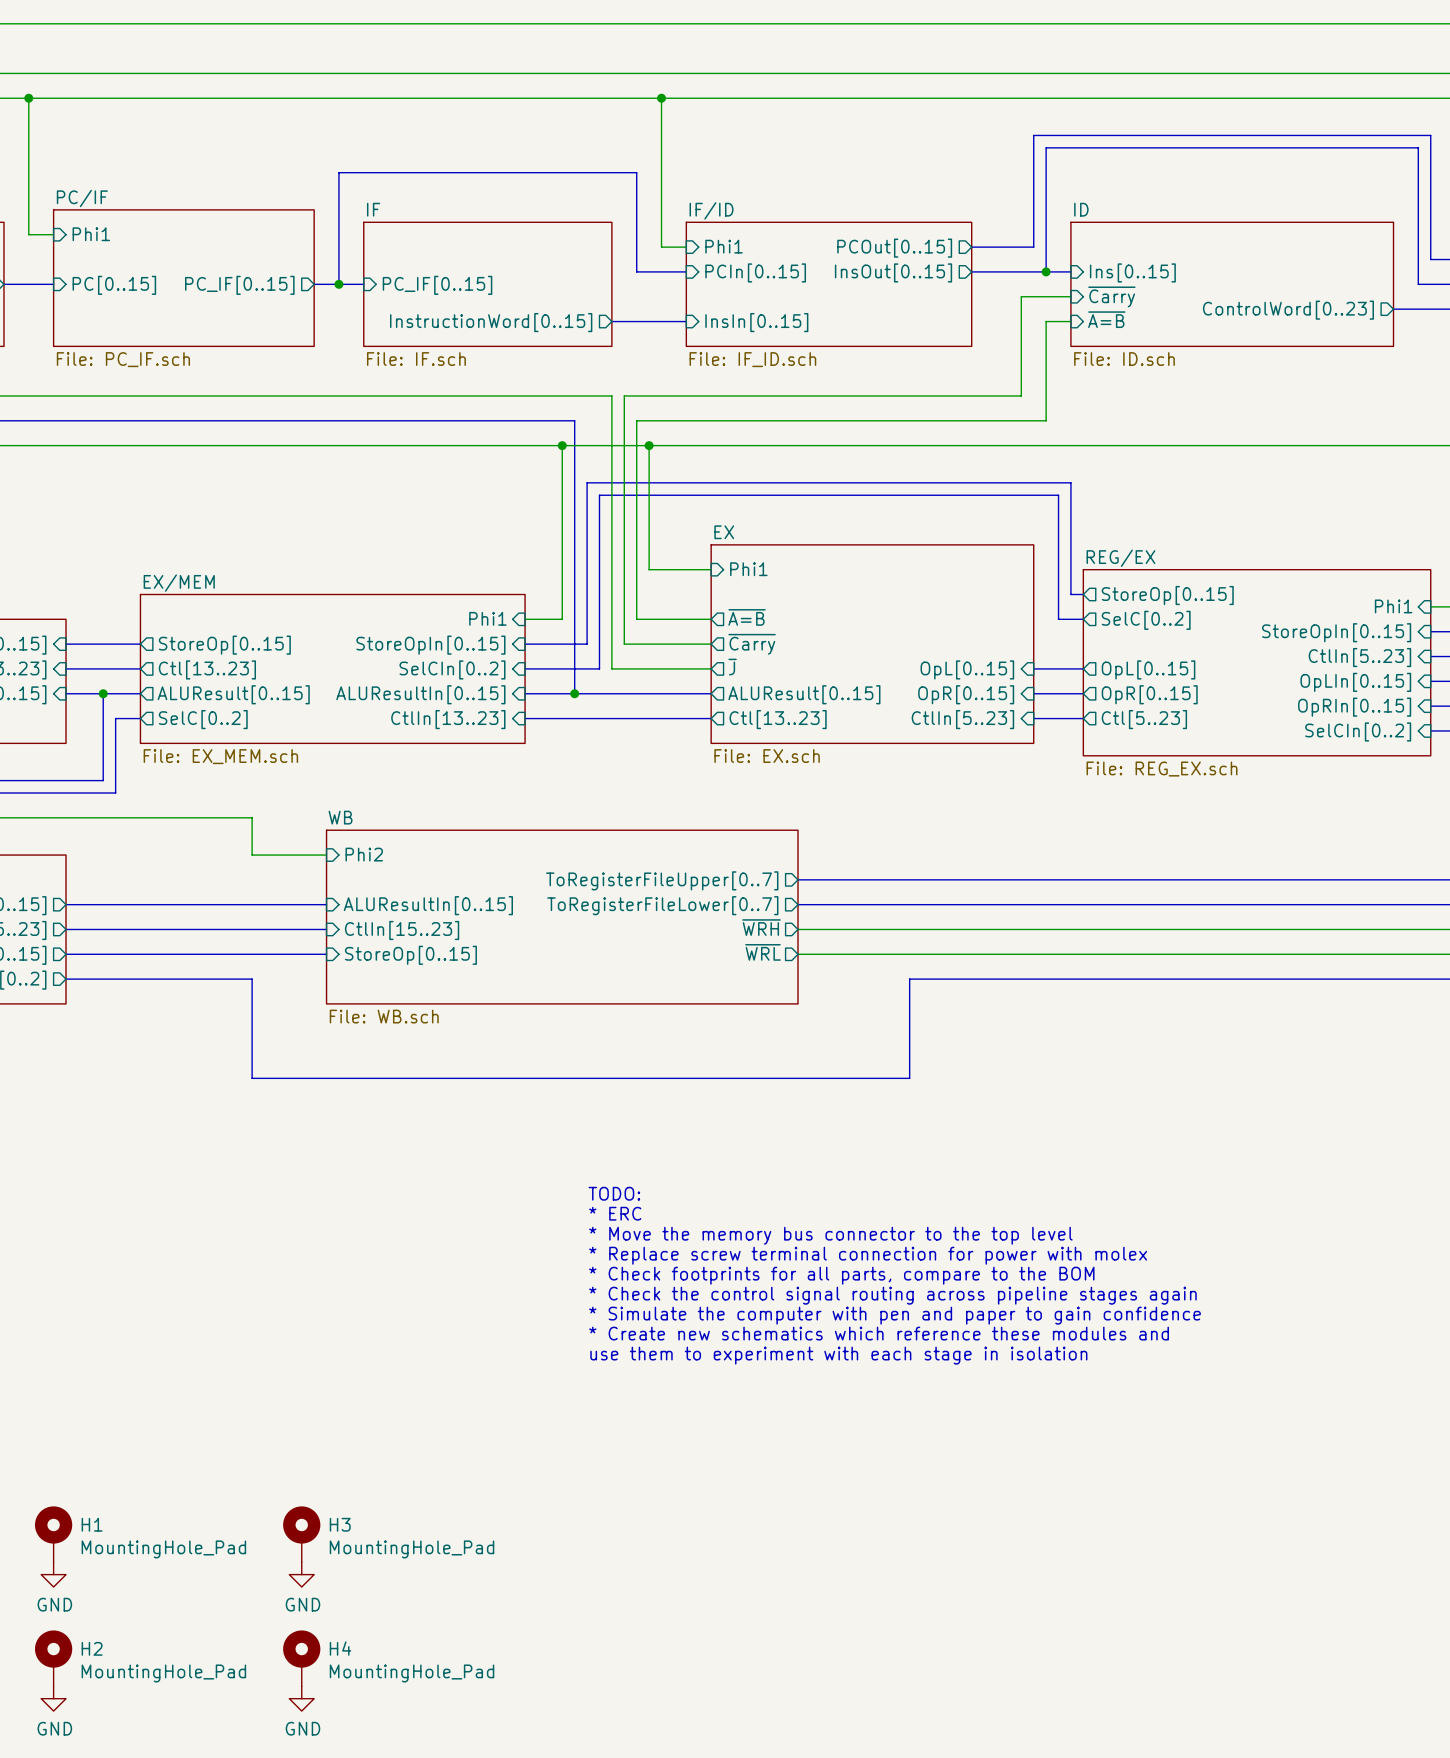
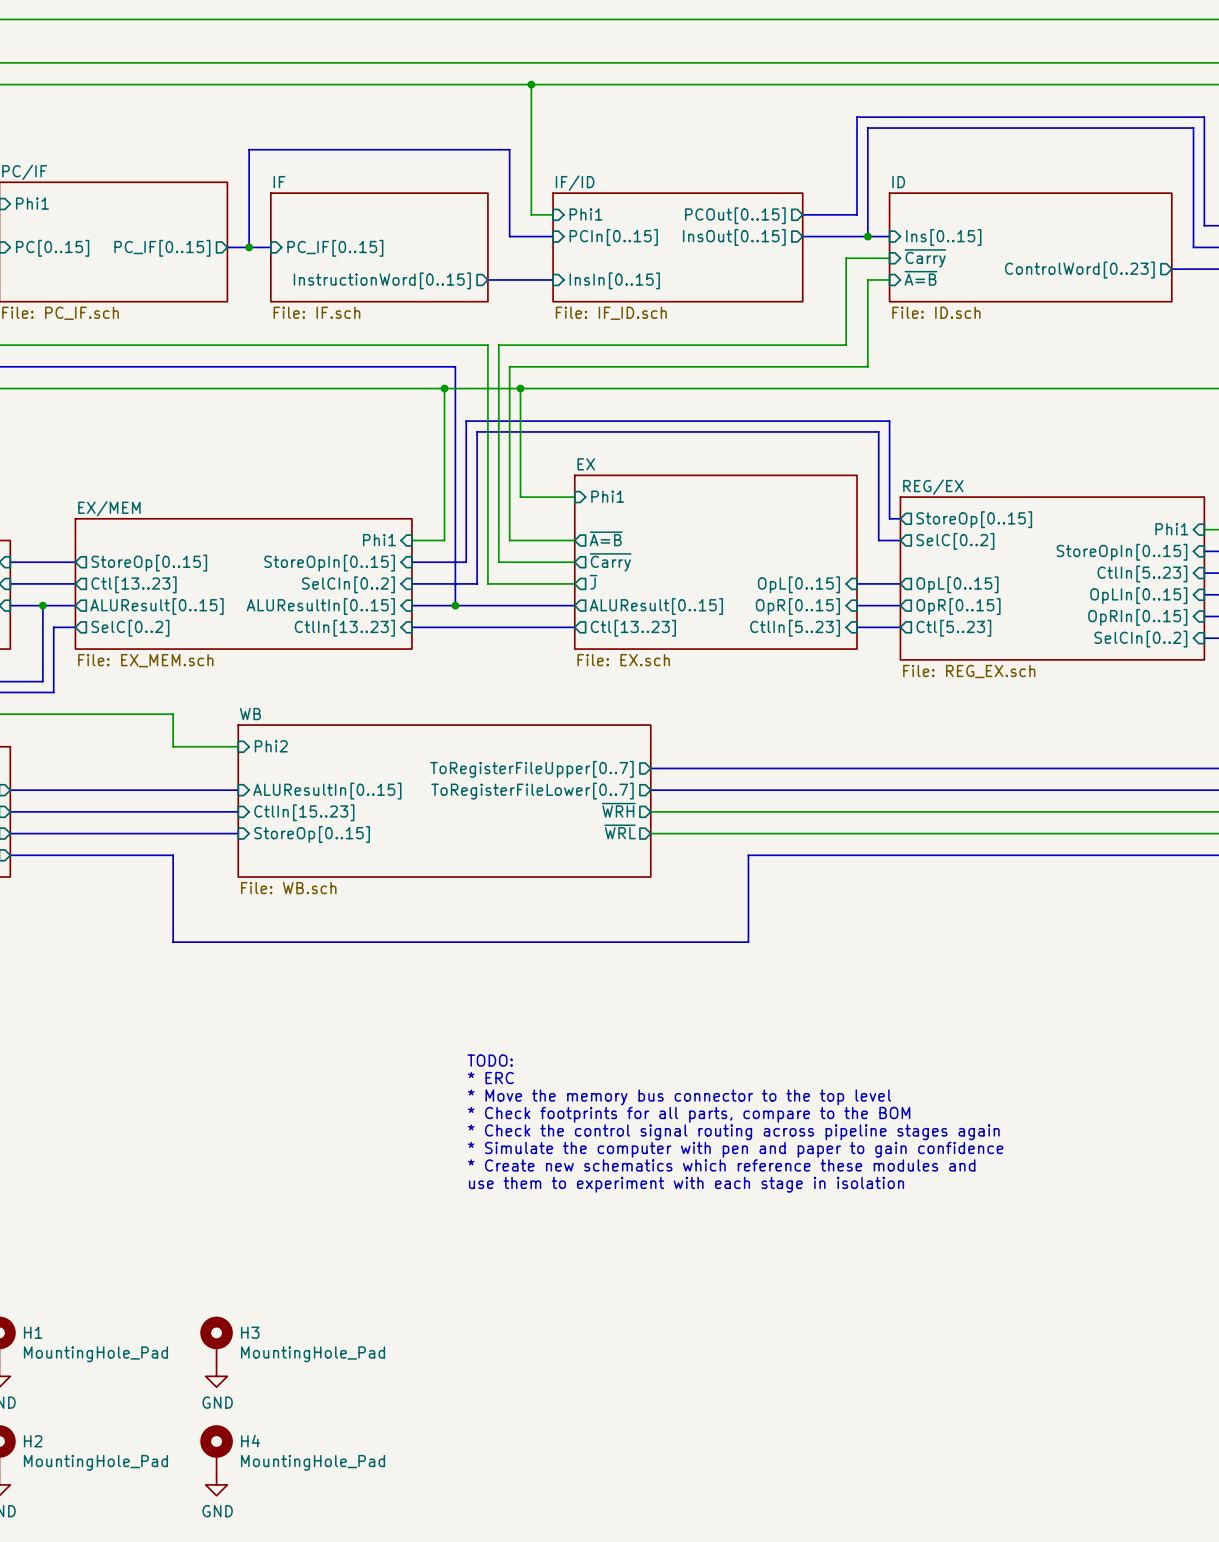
text: TODO: (614, 1193) -> none
text: * ERC (615, 1213) -> TODO: (490, 1060)
text: * Move the memory bus connector to the top level (830, 1235) -> * ERC (490, 1078)
text: * Replace screw terminal connection for power with molex (868, 1255) -> * Move the memory bus connector to the top level (679, 1097)

